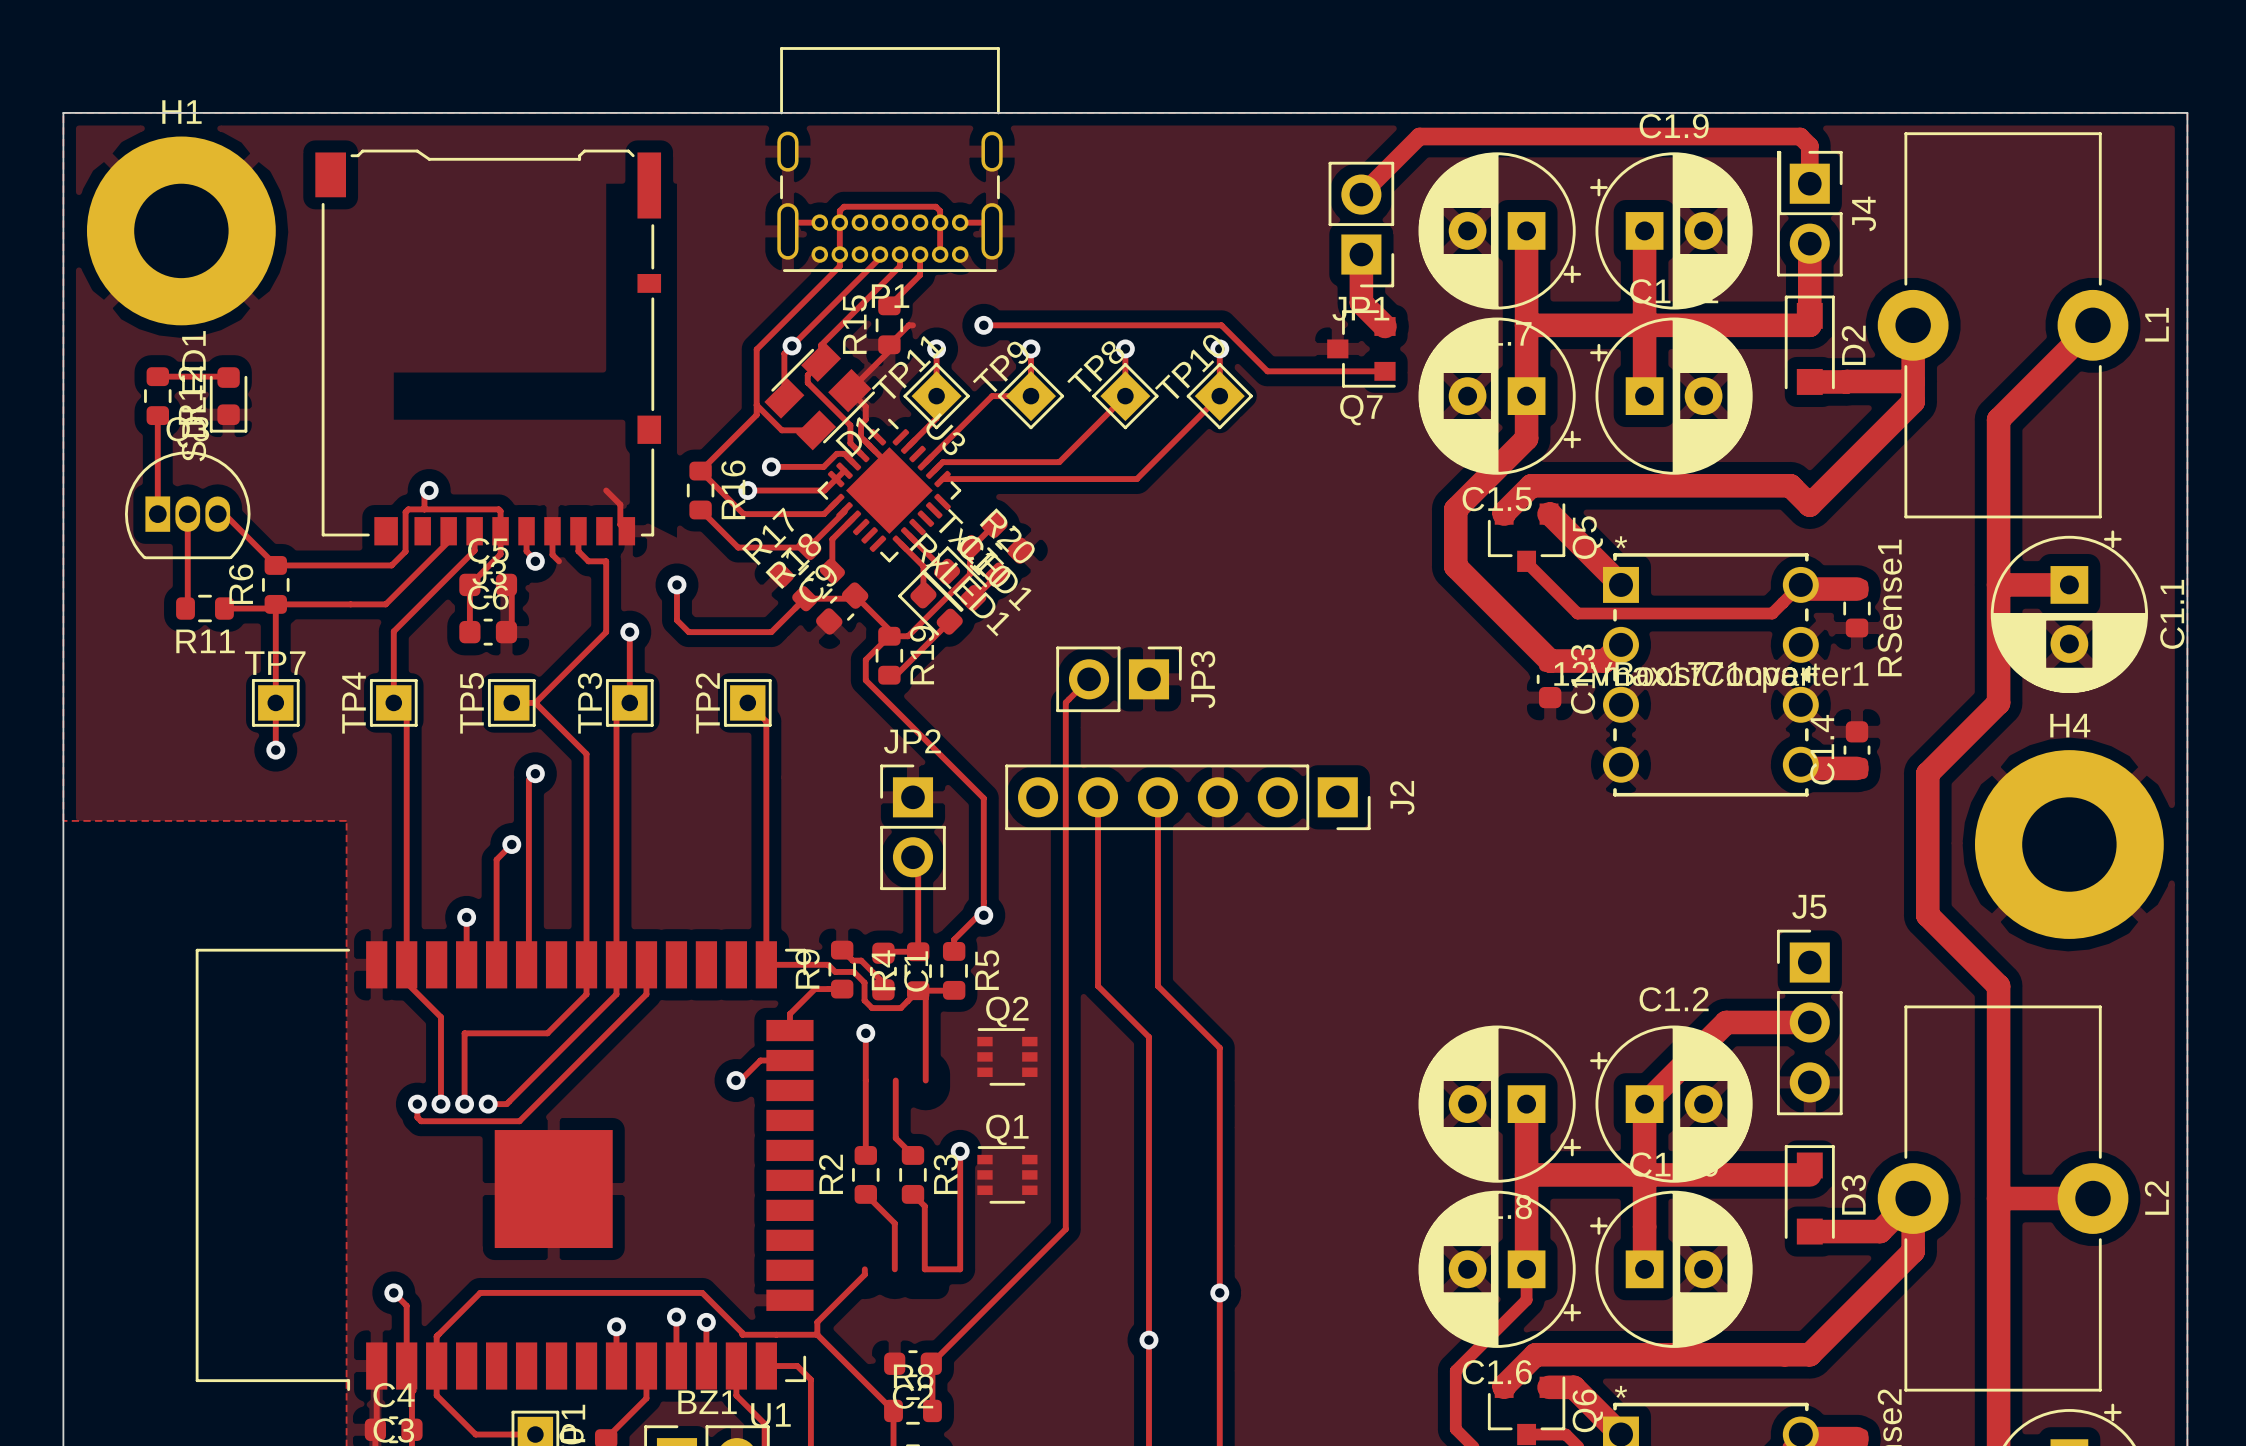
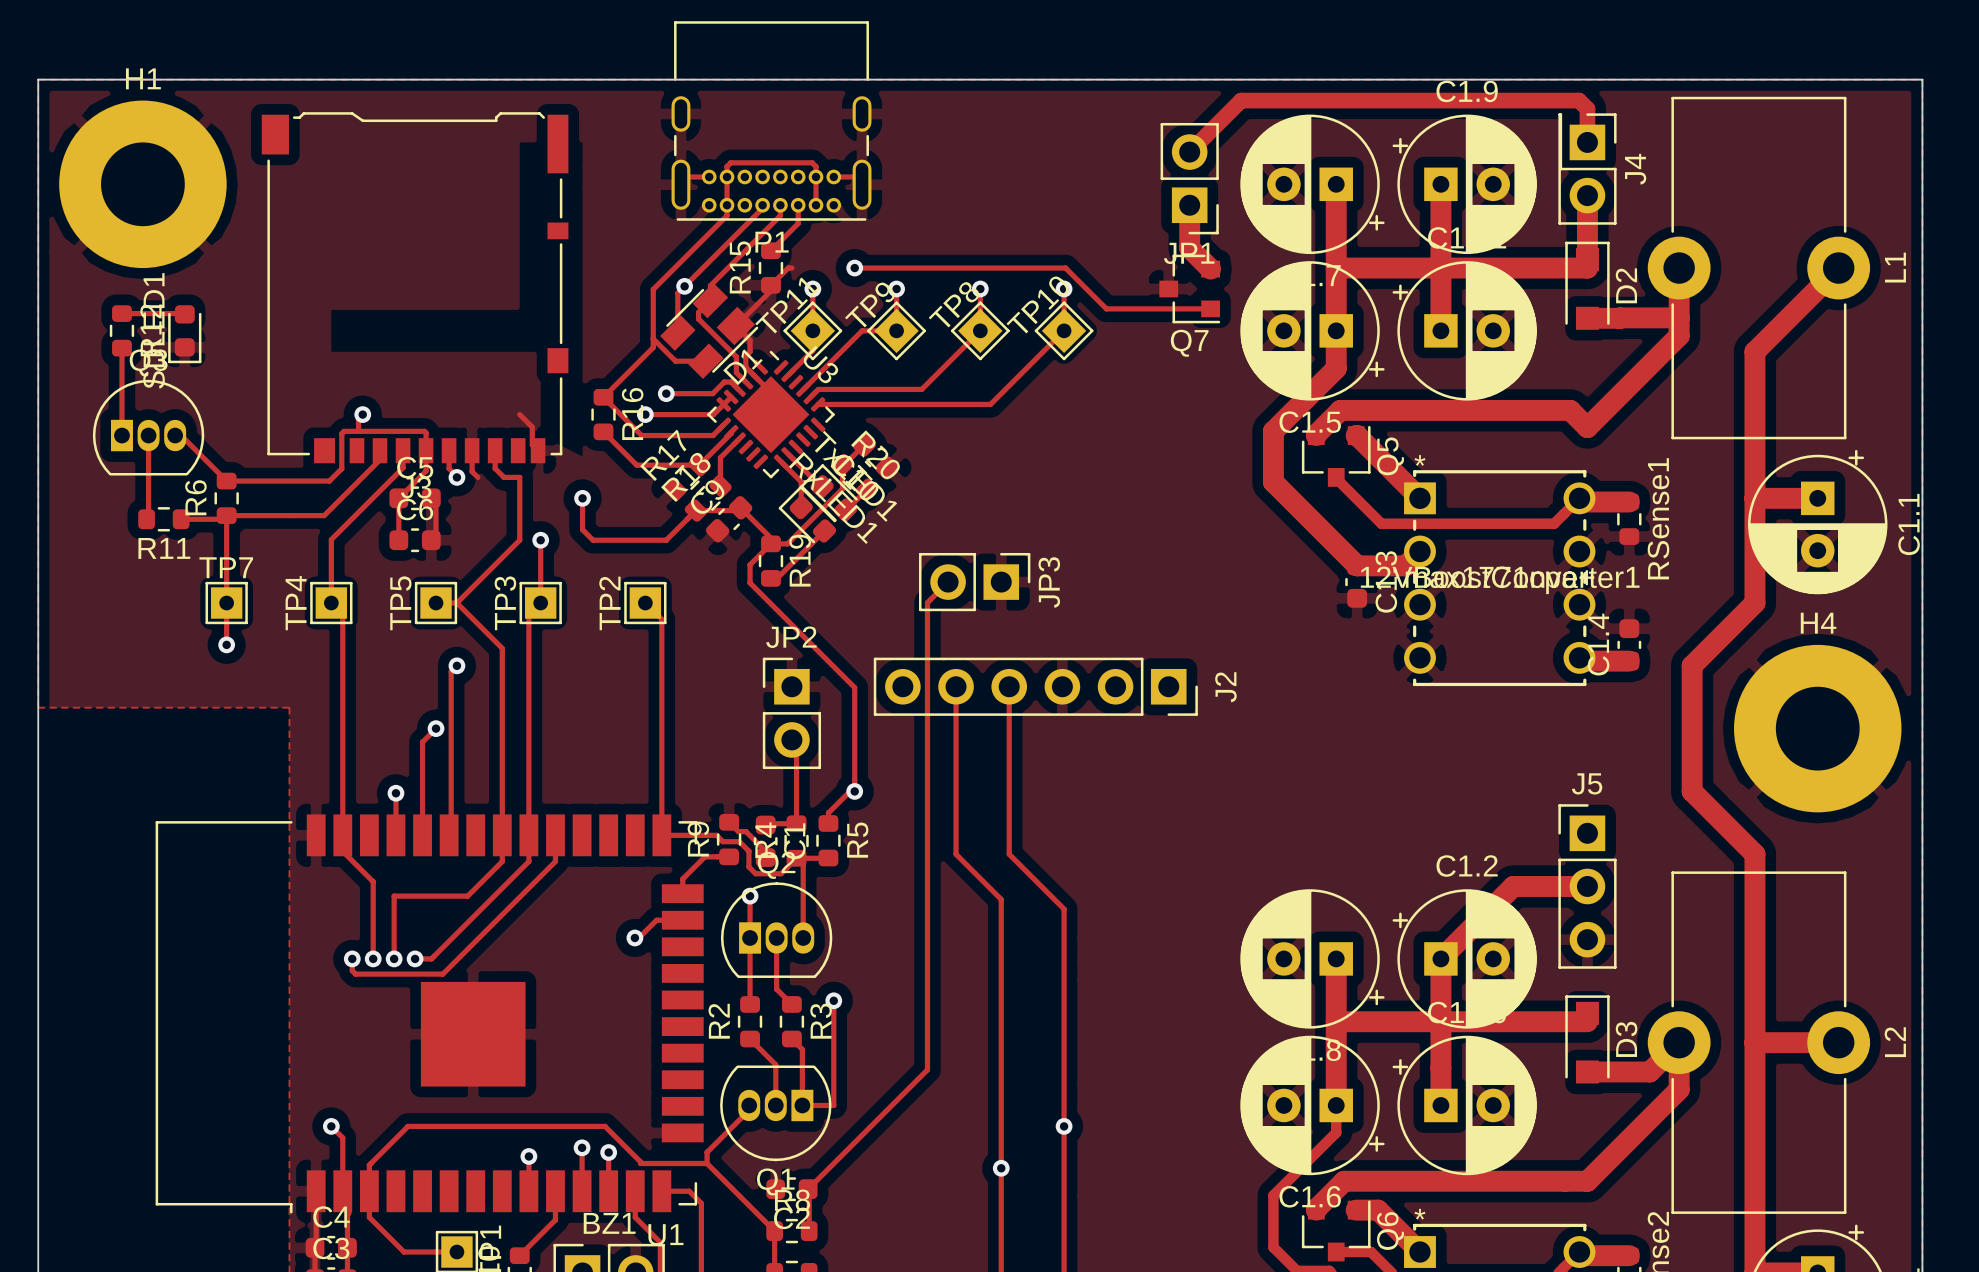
Q2 footprint: [977, 1028, 1038, 1086] -> [720, 882, 833, 978]
Q1 name position: Q1 (1007, 1129) -> Q1 (775, 1181)
Q1 footprint: [977, 1146, 1038, 1204] -> [720, 1065, 832, 1162]

